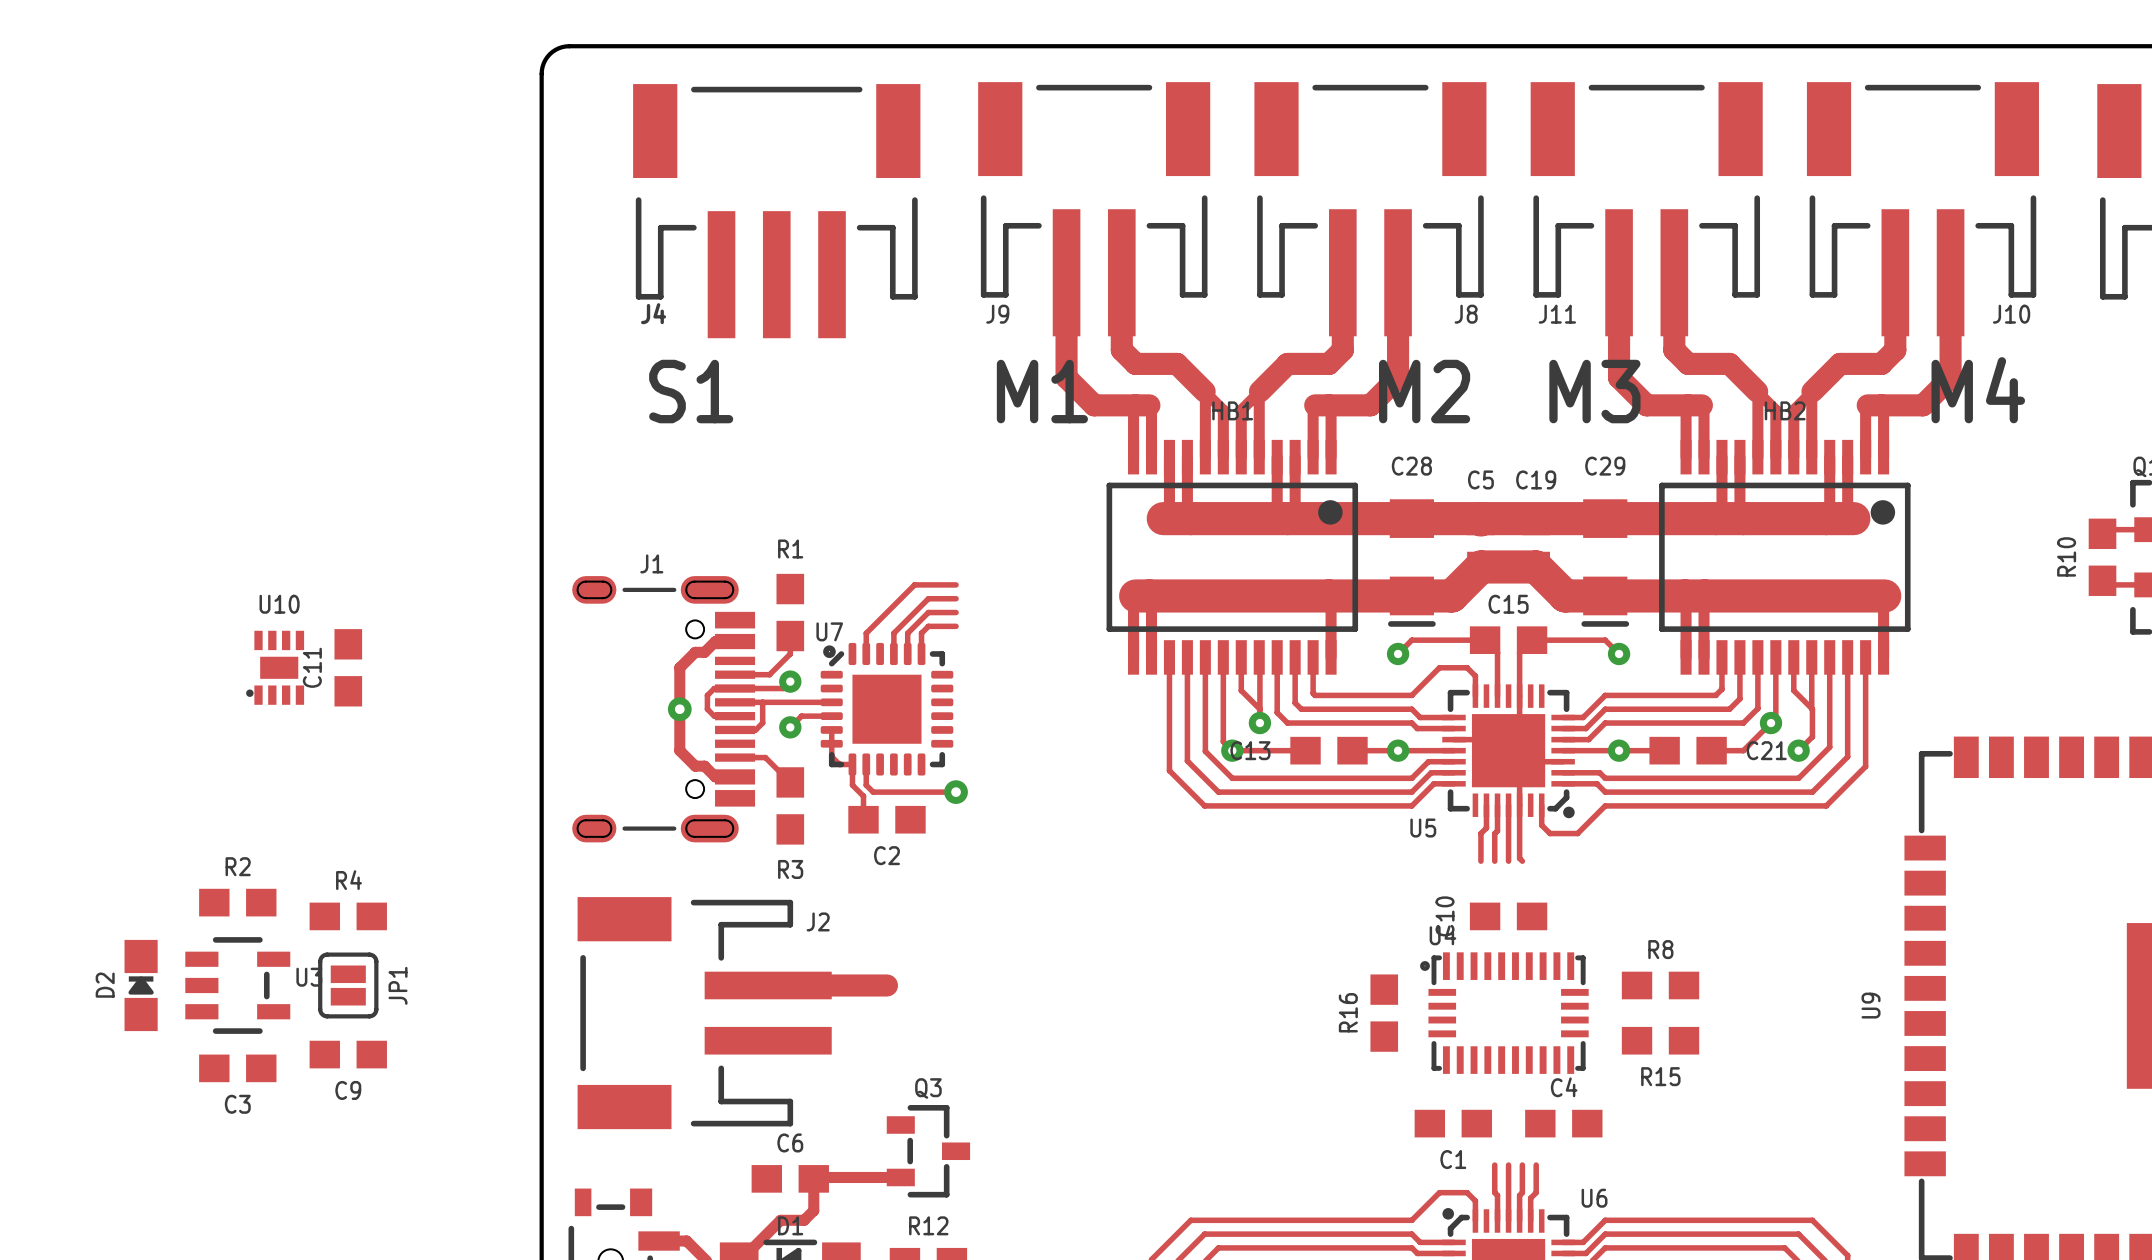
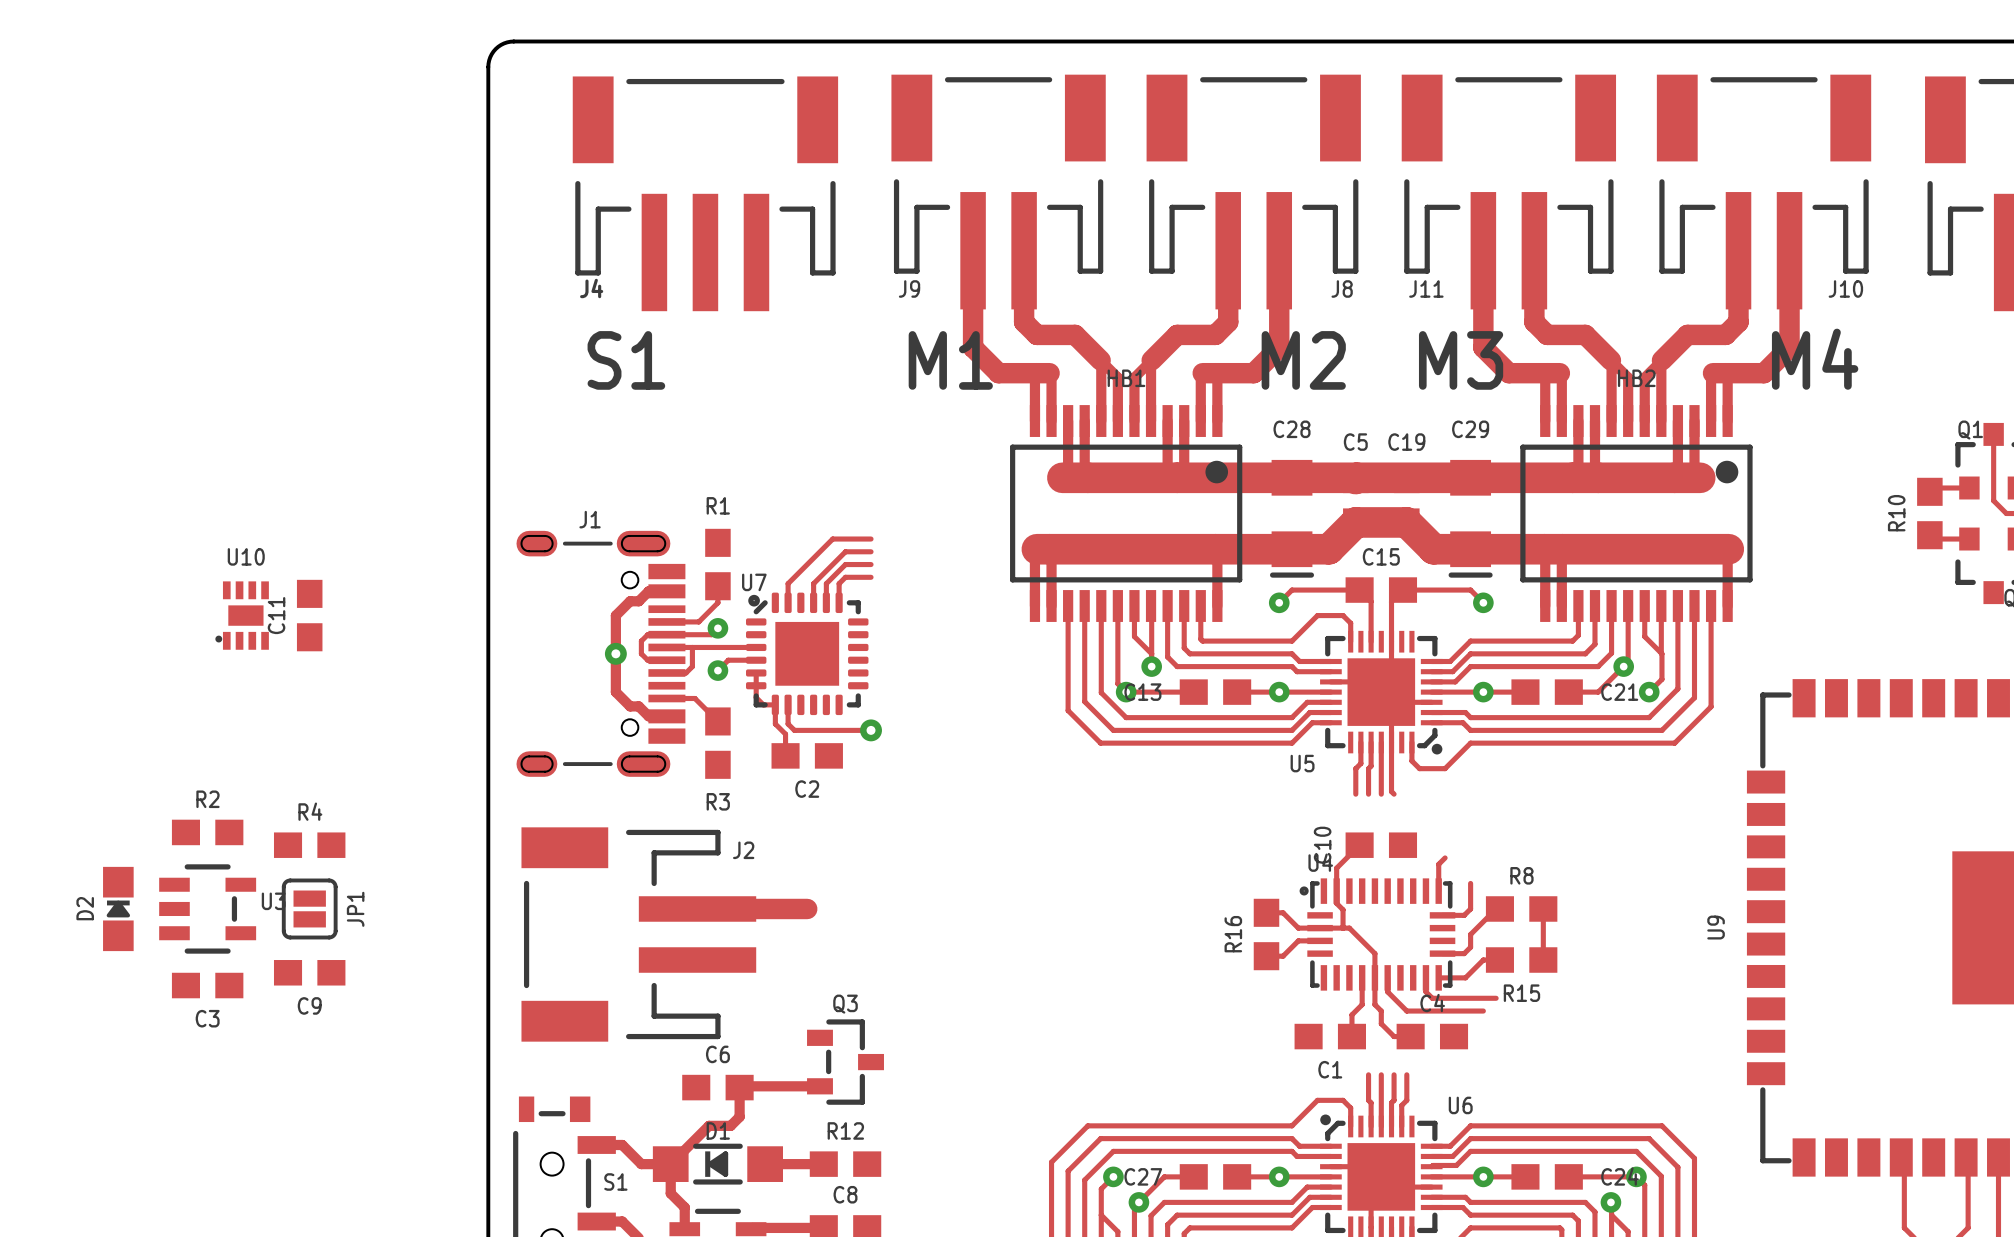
track: none -> (1359, 845) (1336, 868) (1336, 903) (1343, 909) (1343, 928)
track: none -> (1445, 857) (1438, 864) (1438, 891)
track: none -> (1470, 883) (1470, 908) (1464, 915) (1442, 915)
track: none -> (1499, 908) (1496, 908) (1470, 934) (1470, 947) (1464, 953) (1442, 953)
track: none -> (1543, 908) (1543, 960)
track: none -> (1266, 912) (1283, 912) (1298, 928) (1349, 928) (1374, 953) (1374, 1004) (1381, 1011) (1381, 1023) (1394, 1036) (1410, 1036)
track: none -> (1320, 940) (1298, 940) (1283, 956) (1266, 956)
track: none -> (1499, 960) (1483, 960) (1465, 977) (1438, 977)
track: none -> (1362, 977) (1362, 1004) (1351, 1014) (1351, 1036)
track: none -> (1387, 977) (1387, 991) (1406, 1011) (1483, 1011)
track: none -> (1425, 977) (1425, 991) (1432, 998) (1496, 998)

